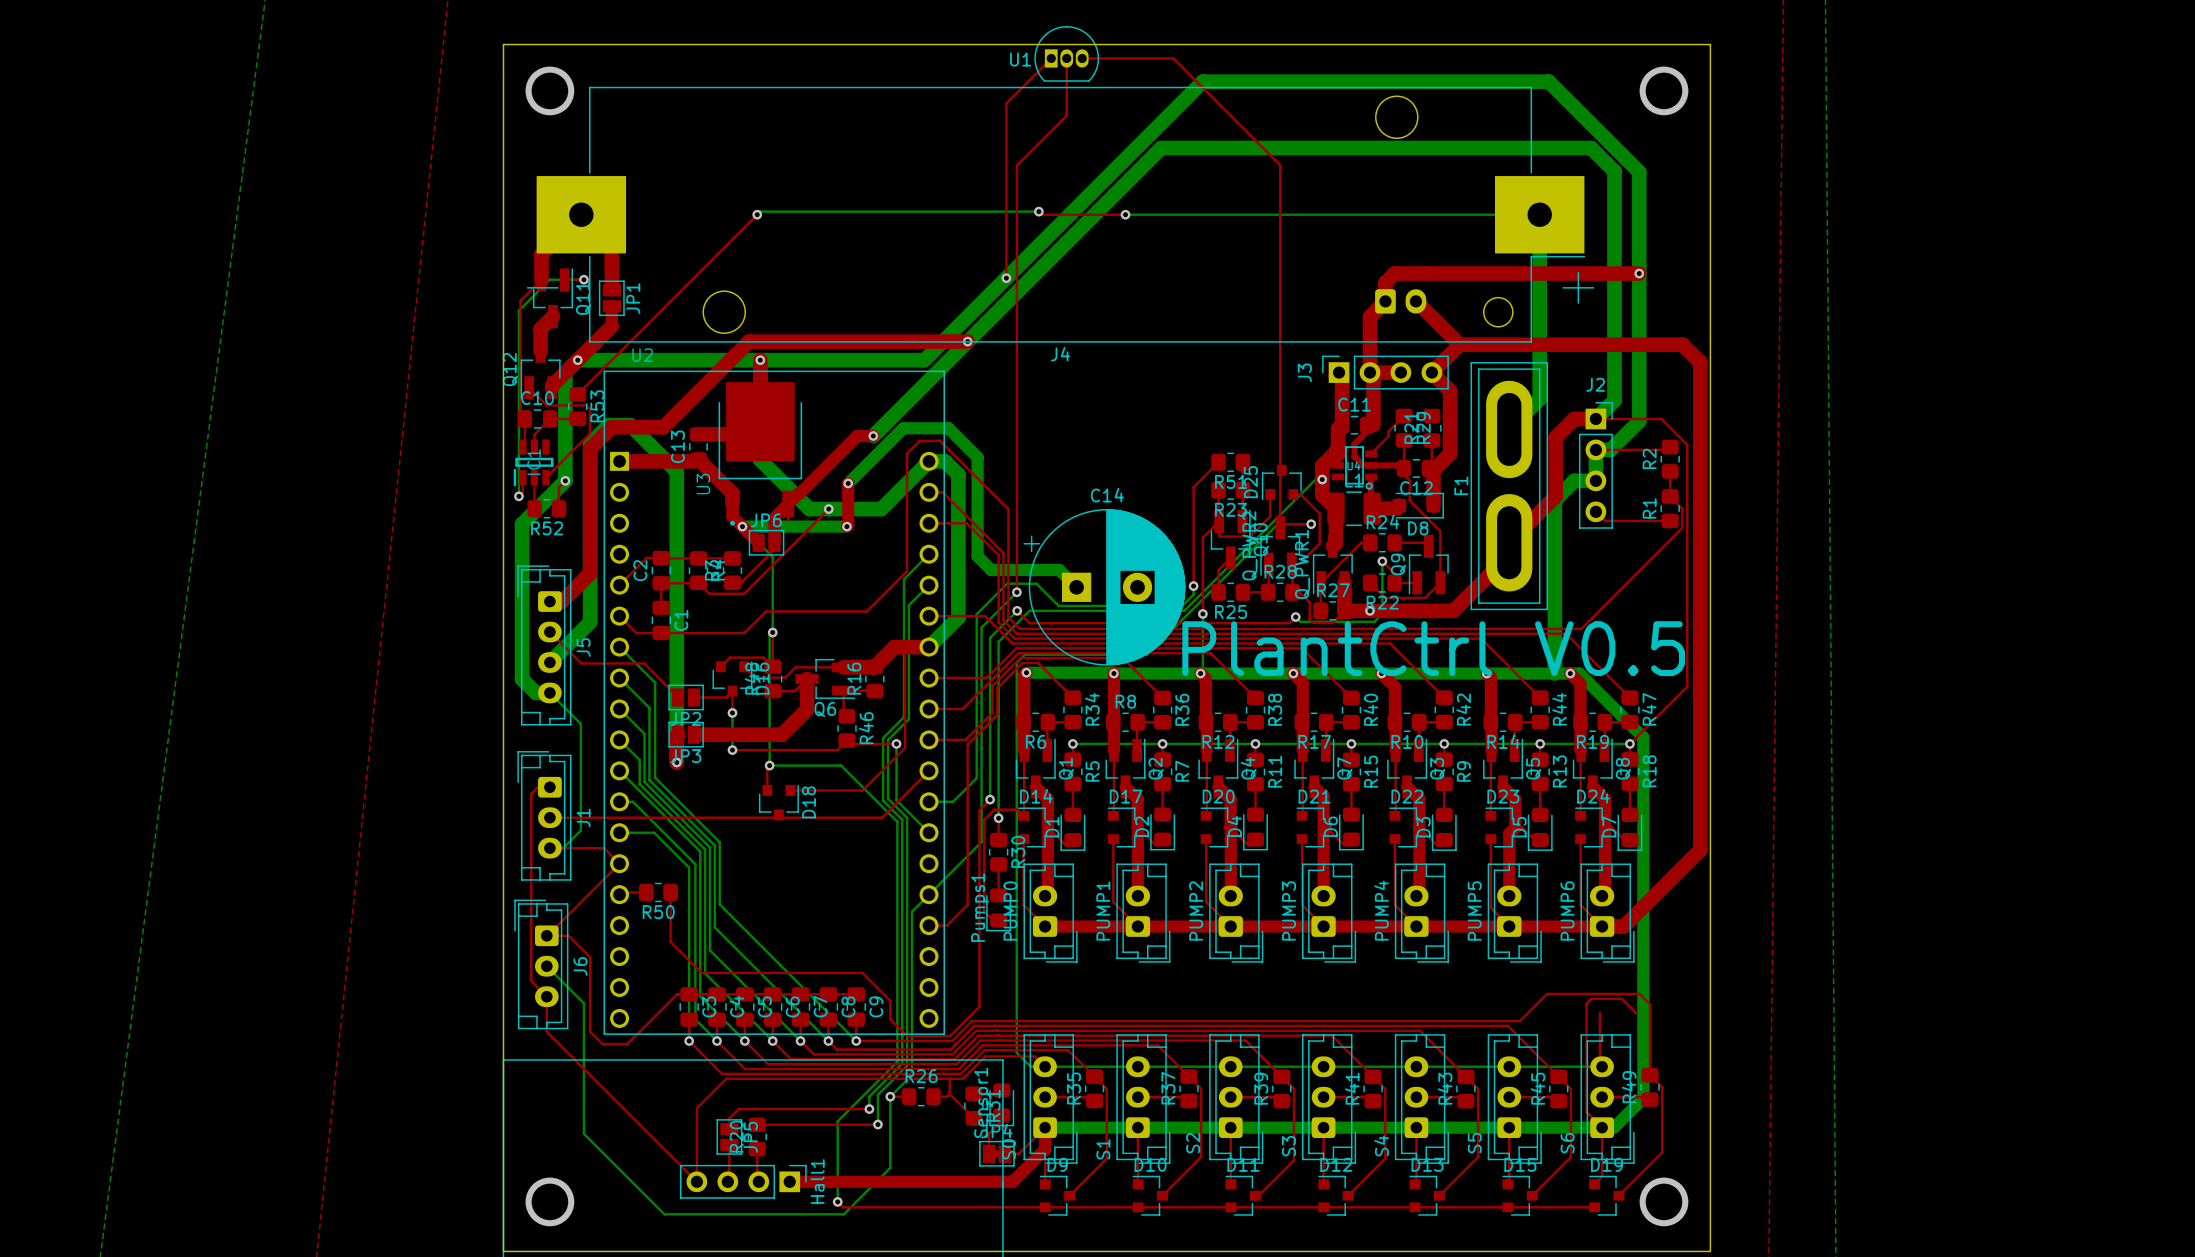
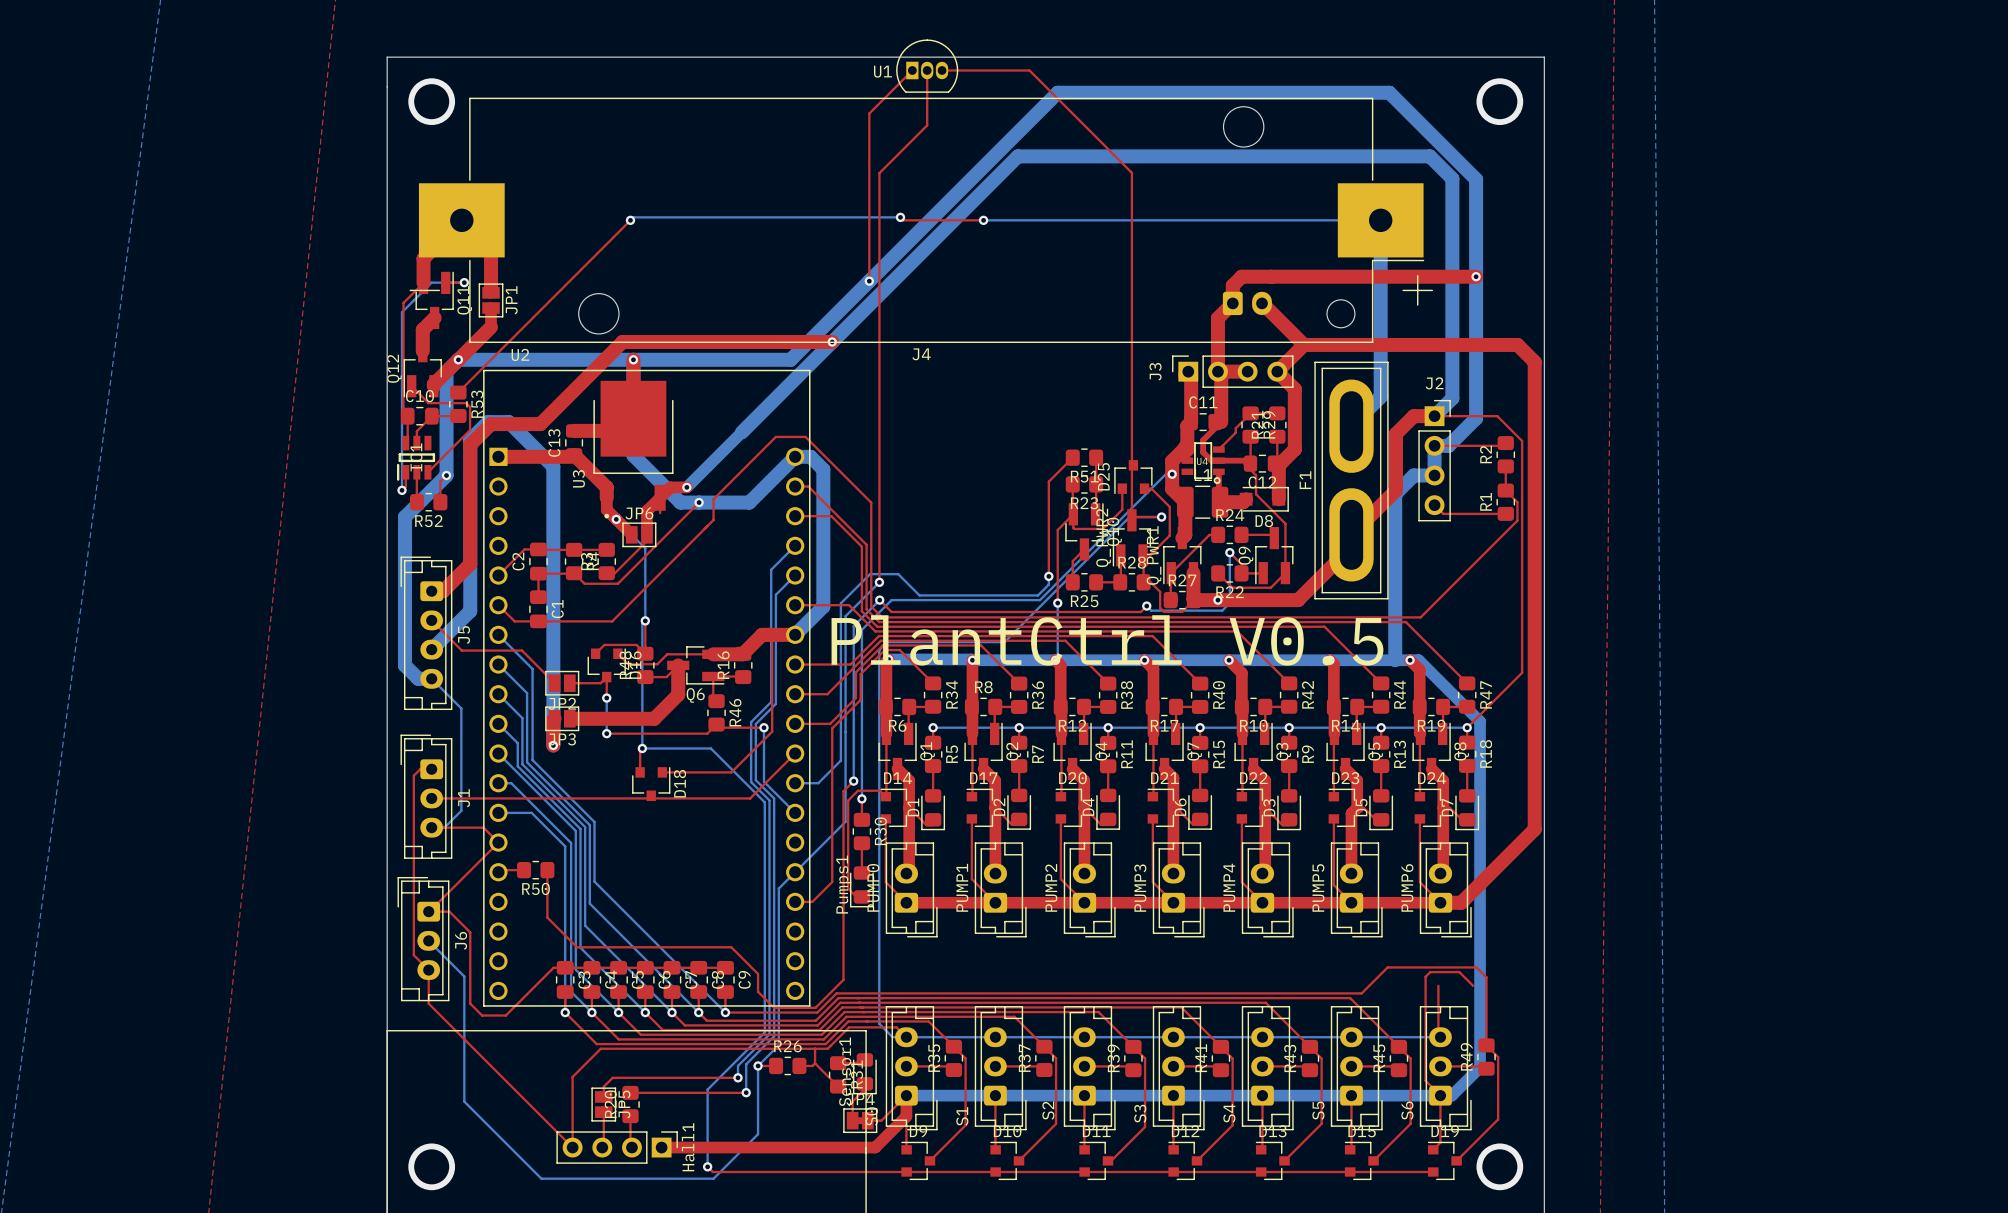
top track: (873, 435) (857, 435) (799, 493) -> (686, 487) (671, 487)
bottom track: none -> (741, 432) (686, 487)
via: (873, 435) -> none
top track: (939, 440) (919, 441) (907, 453) (907, 571) (866, 611) (765, 611) (744, 633) (738, 633) -> (805, 436) (775, 436) (713, 499) (713, 520) (612, 621)
top track: (848, 483) (846, 526) -> none
bottom track: (848, 483) (903, 428) (948, 428) (977, 457) (977, 556) (991, 569) (1059, 569) (1076, 587) -> none
via: (848, 483) -> none
via: none -> (686, 487)
bottom track: (742, 526) (846, 526) -> none
via: (846, 526) -> none
C14: (1104, 587) -> none
text position: PlantCtrl V0.5 (1433, 648) -> PlantCtrl V0.5 (1107, 640)

